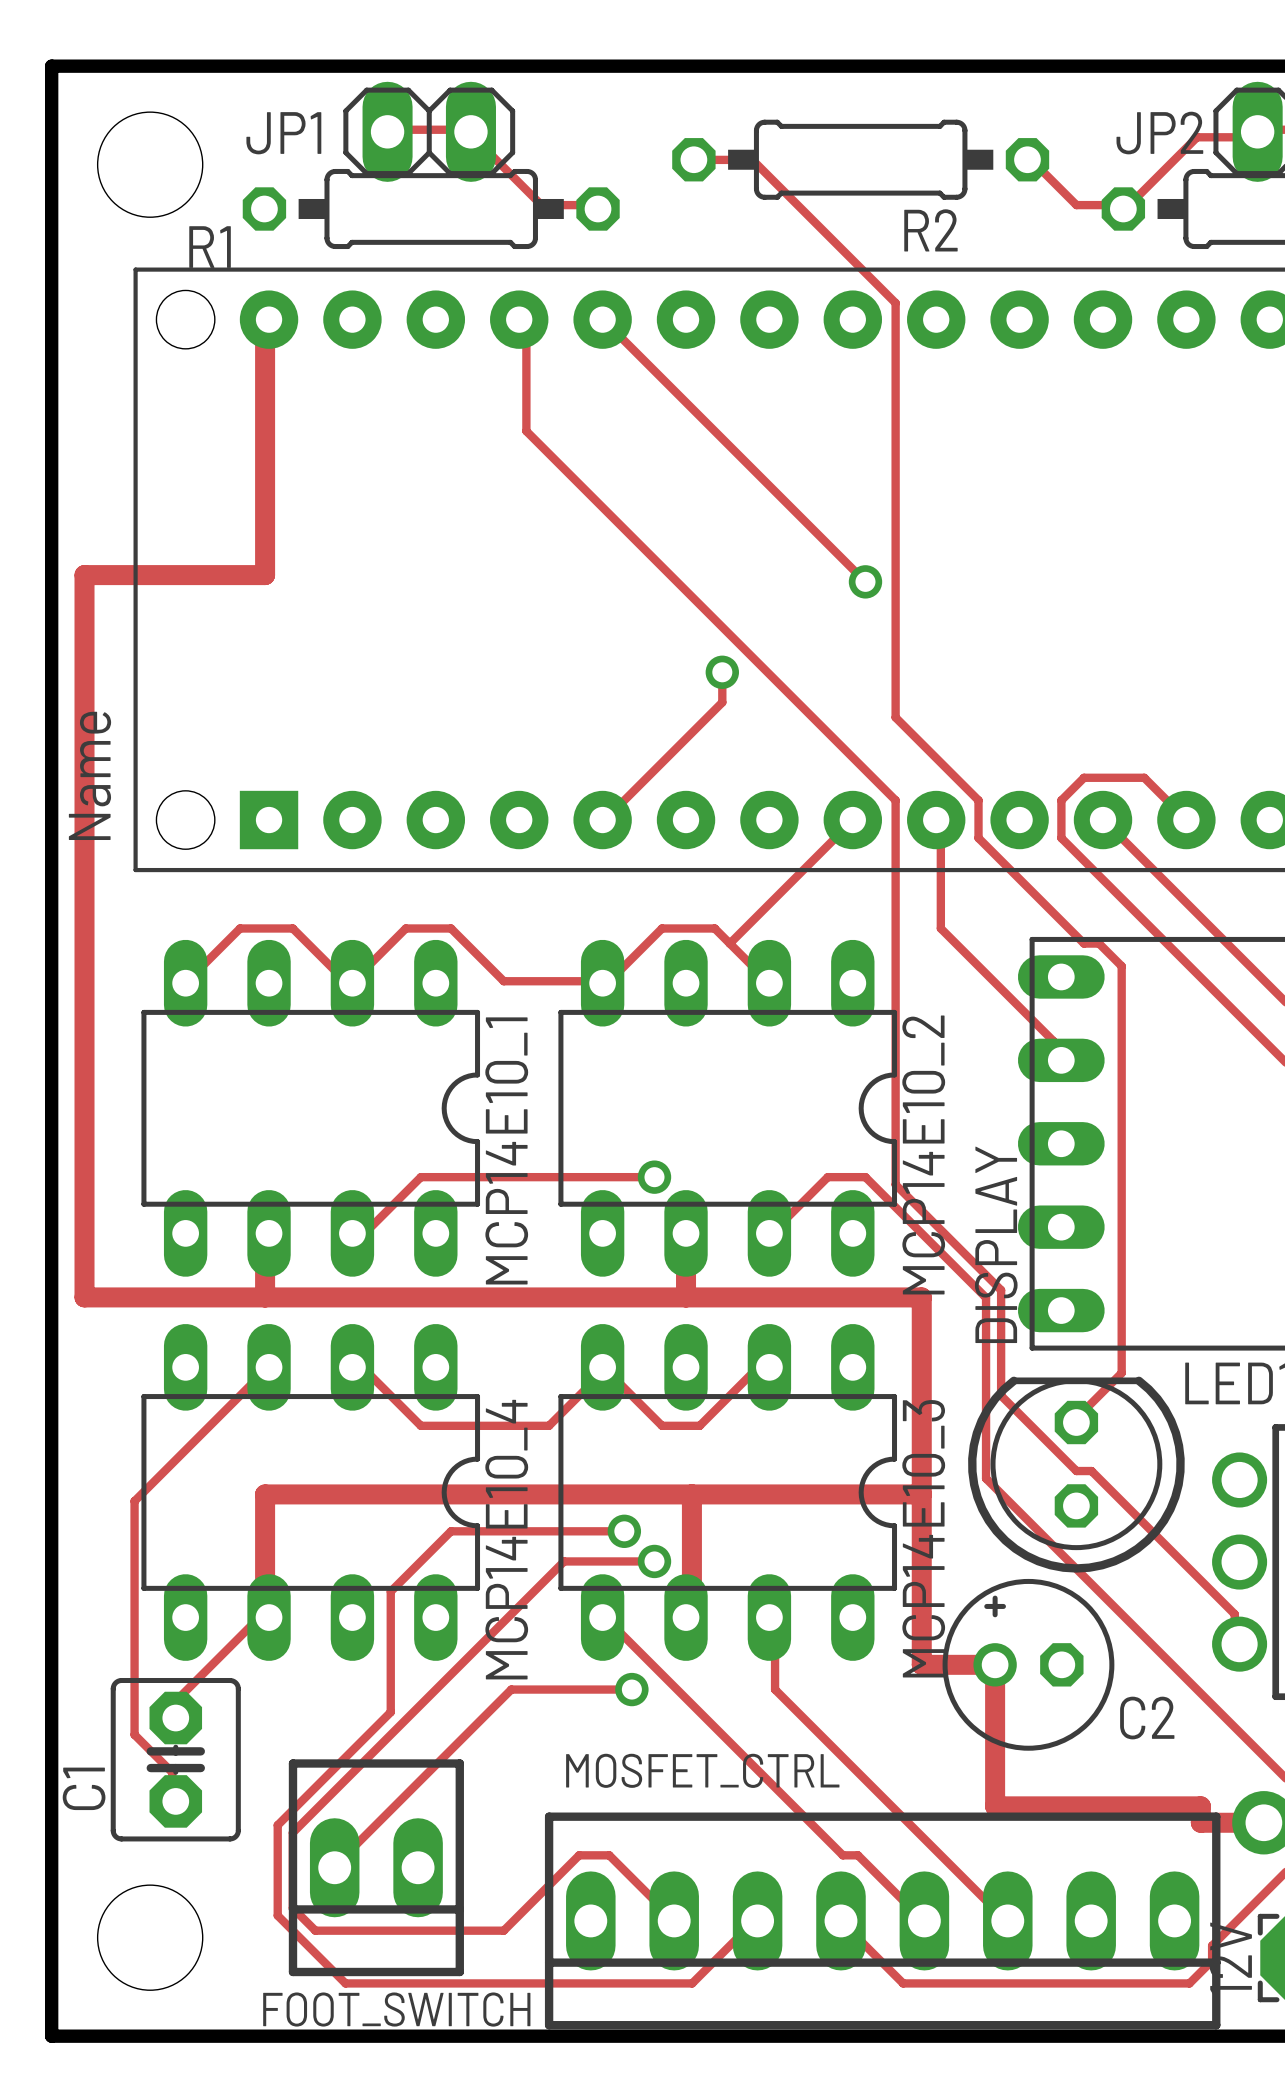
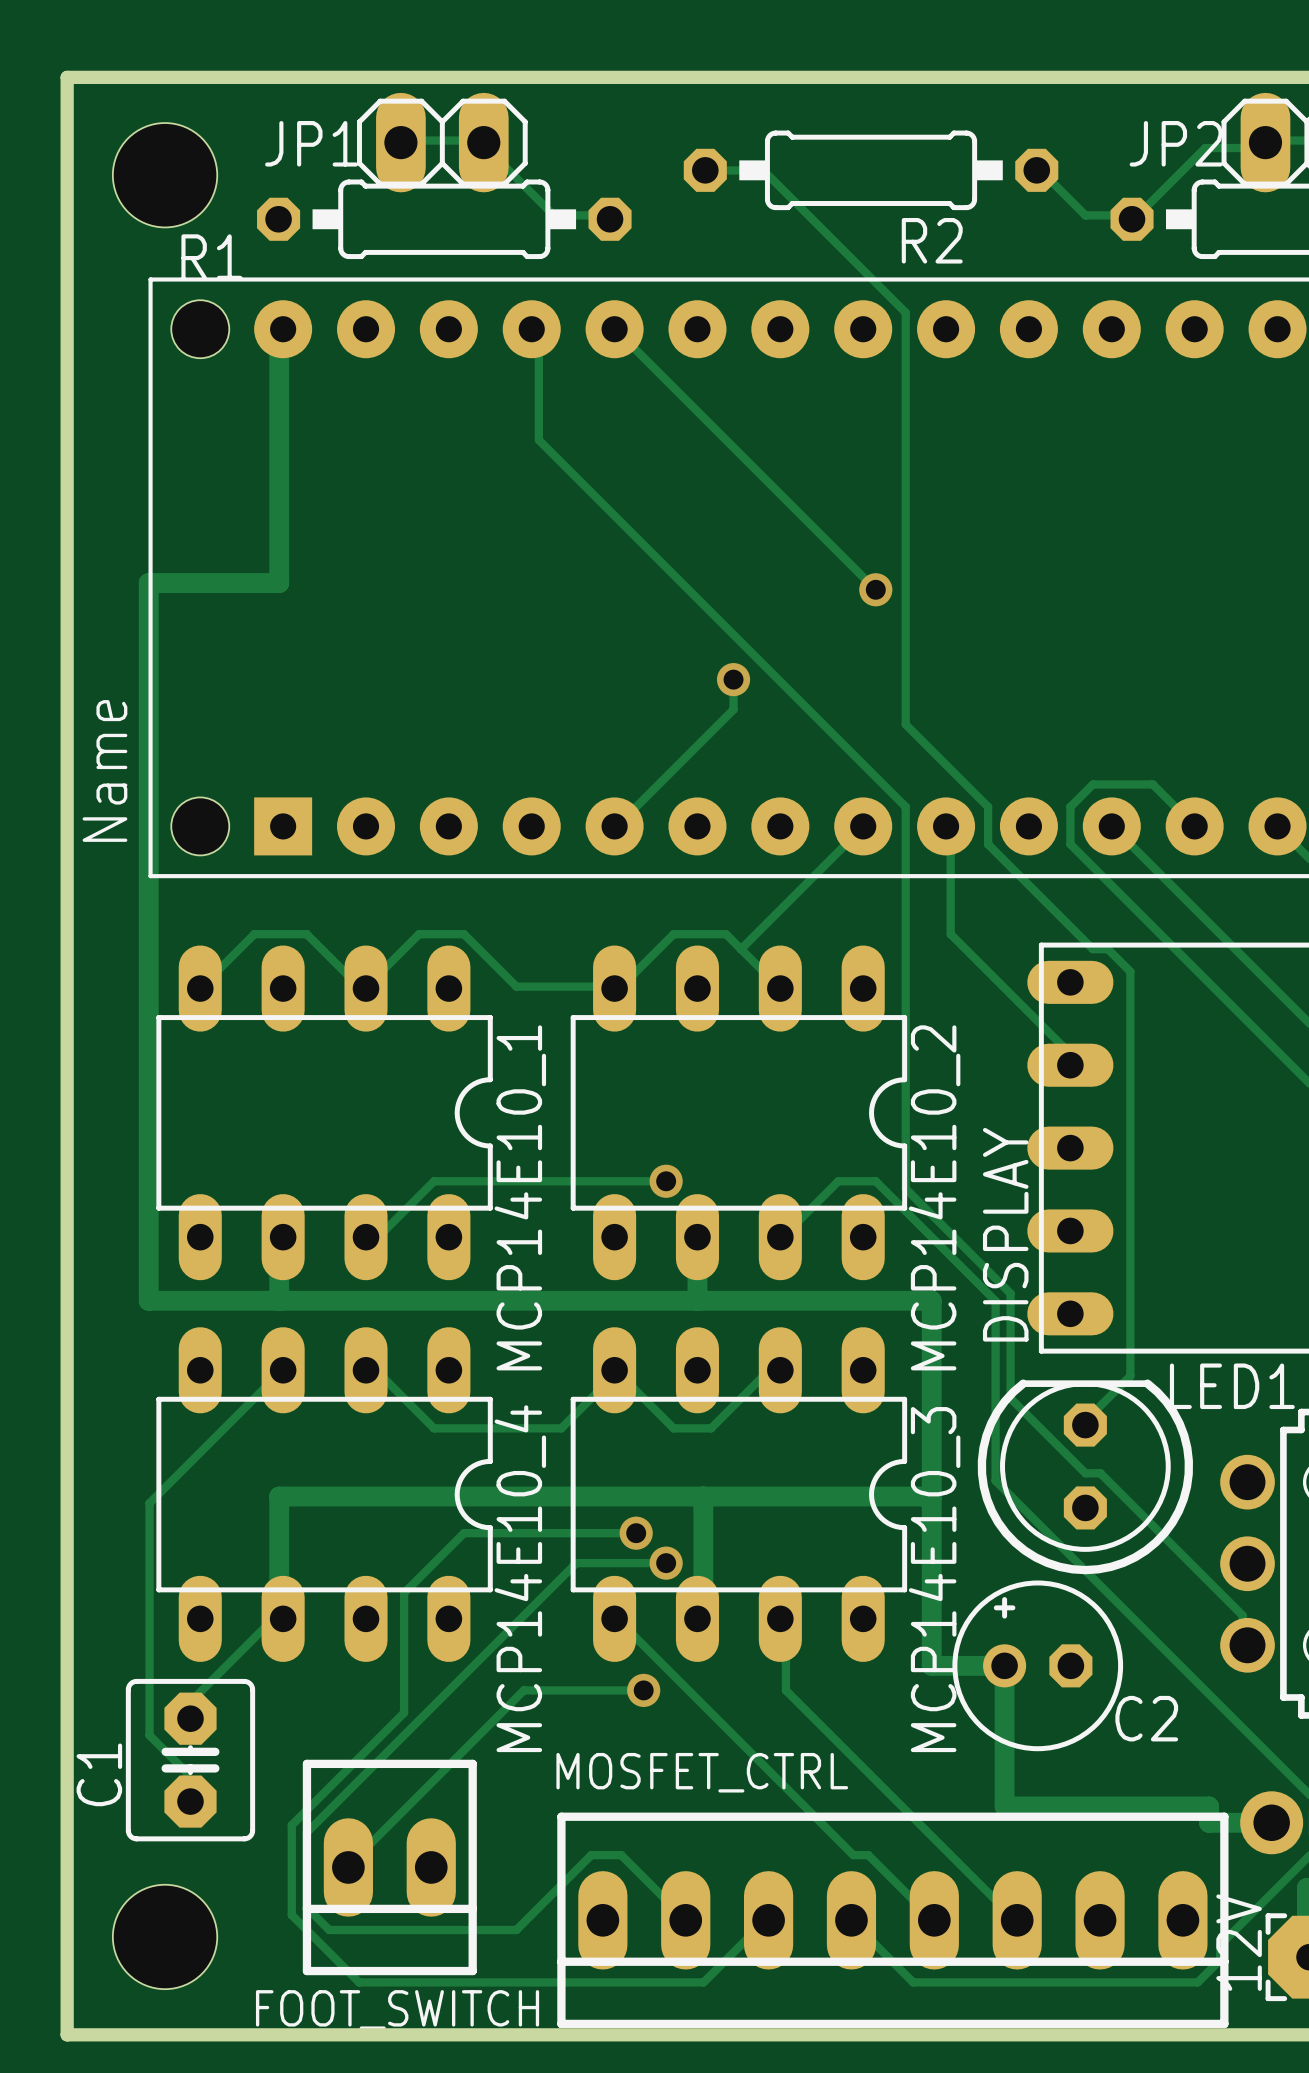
track: (133, 575) (84, 575) (84, 1297) (133, 1297) -> (148, 583) (148, 1300)

